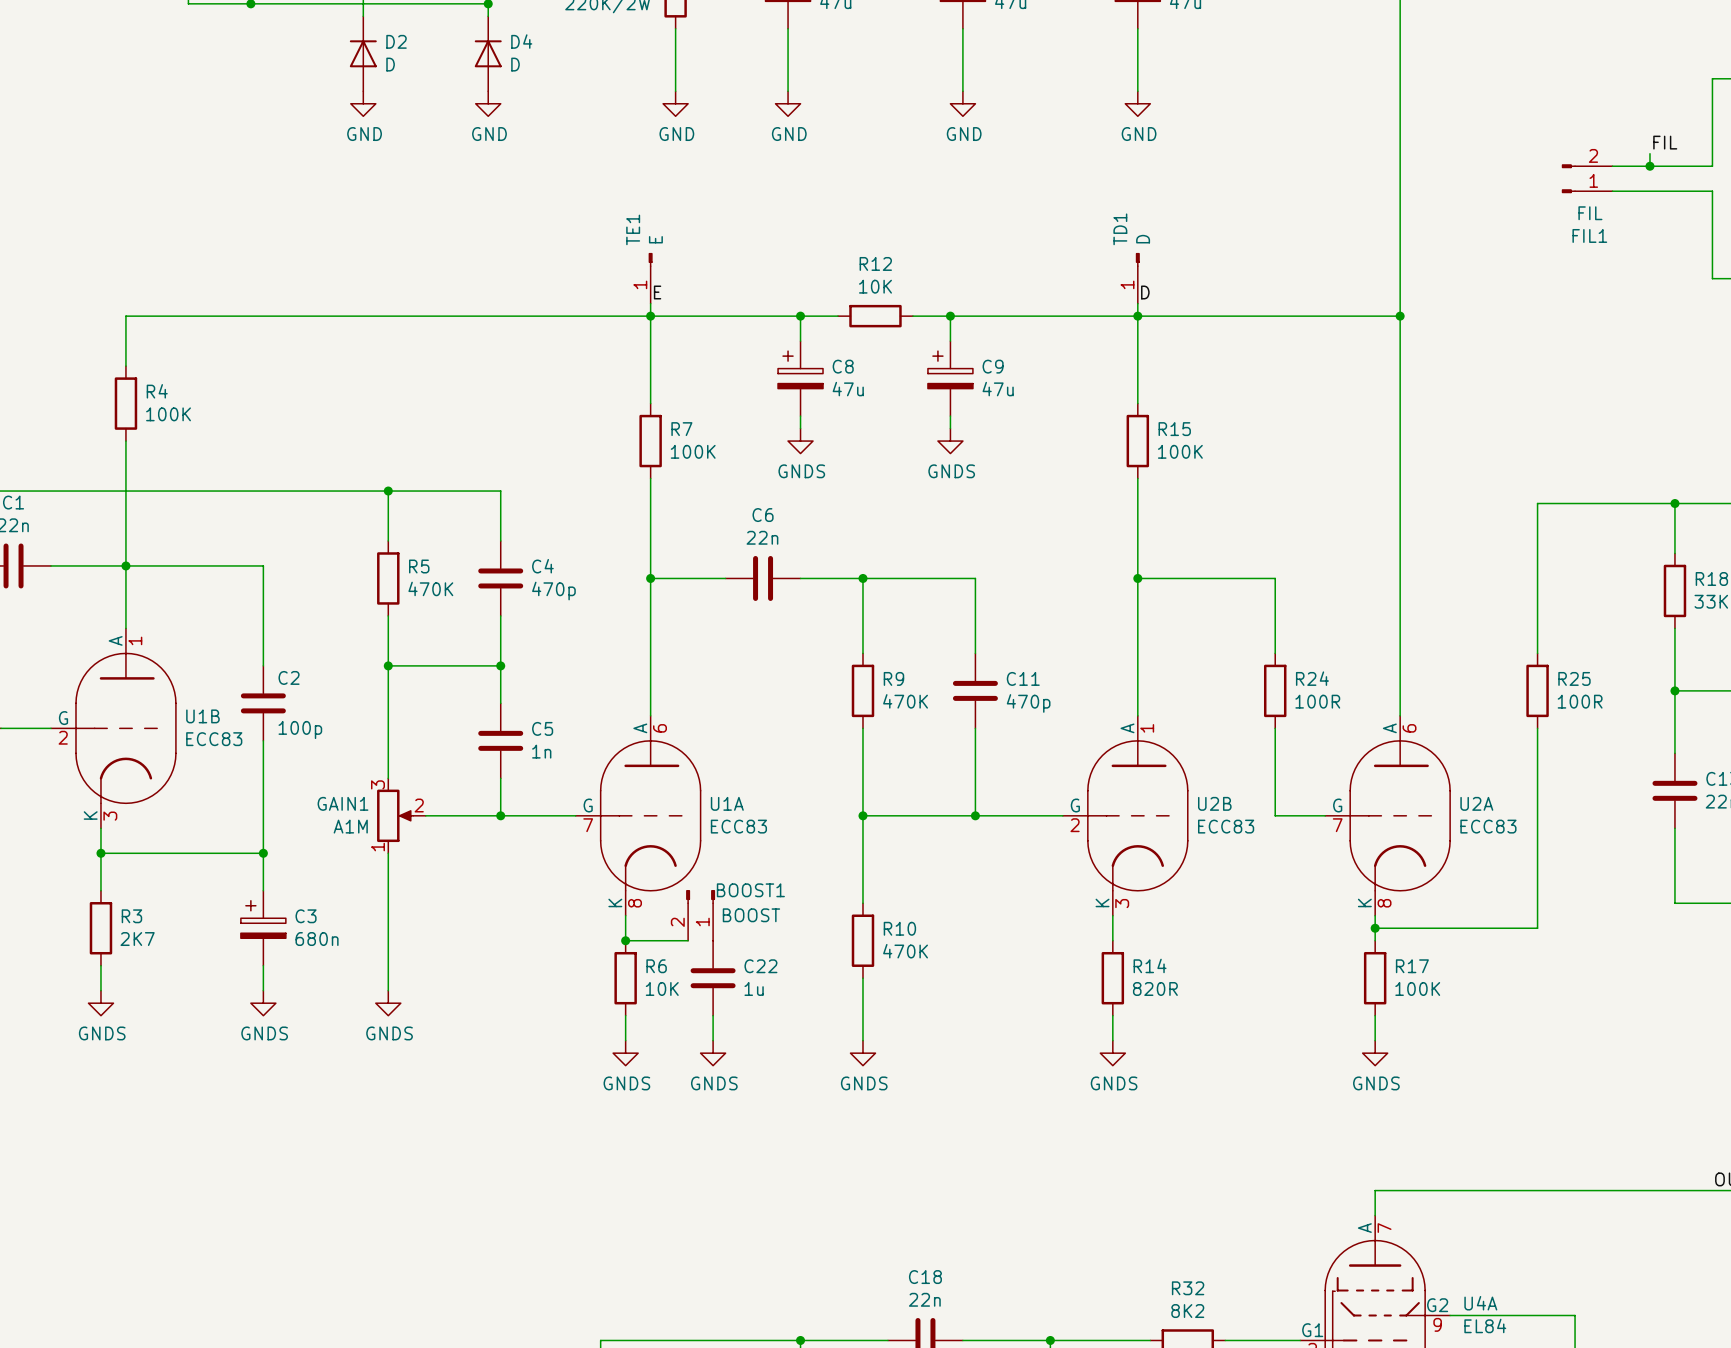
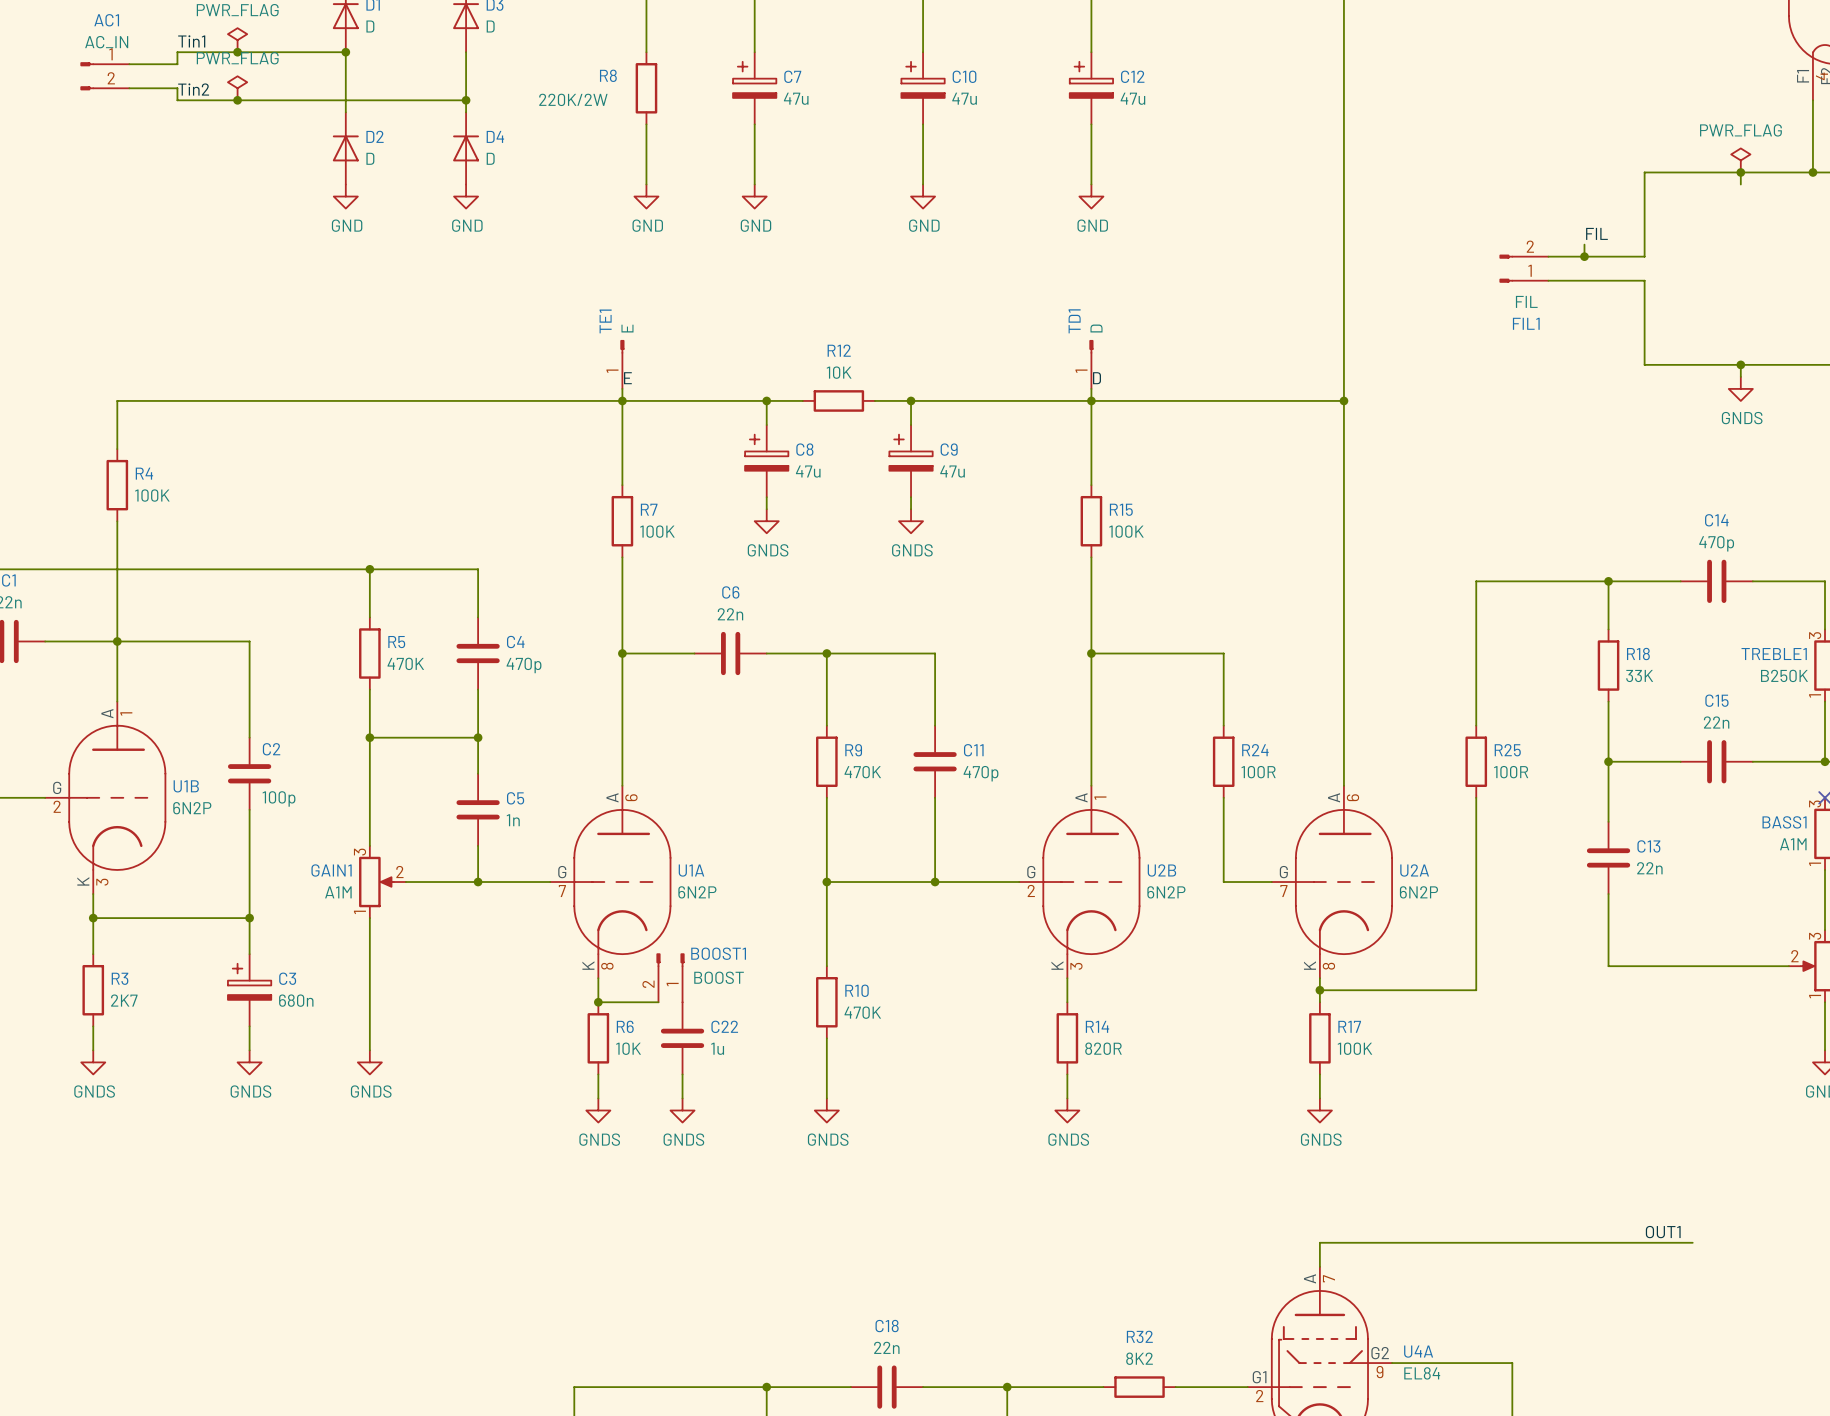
U1B value: ECC83 (214, 739) -> 6N2P (192, 808)
U1A value: ECC83 (738, 826) -> 6N2P (697, 892)
U2B value: ECC83 (1226, 826) -> 6N2P (1166, 892)
U2A value: ECC83 (1488, 826) -> 6N2P (1418, 892)

